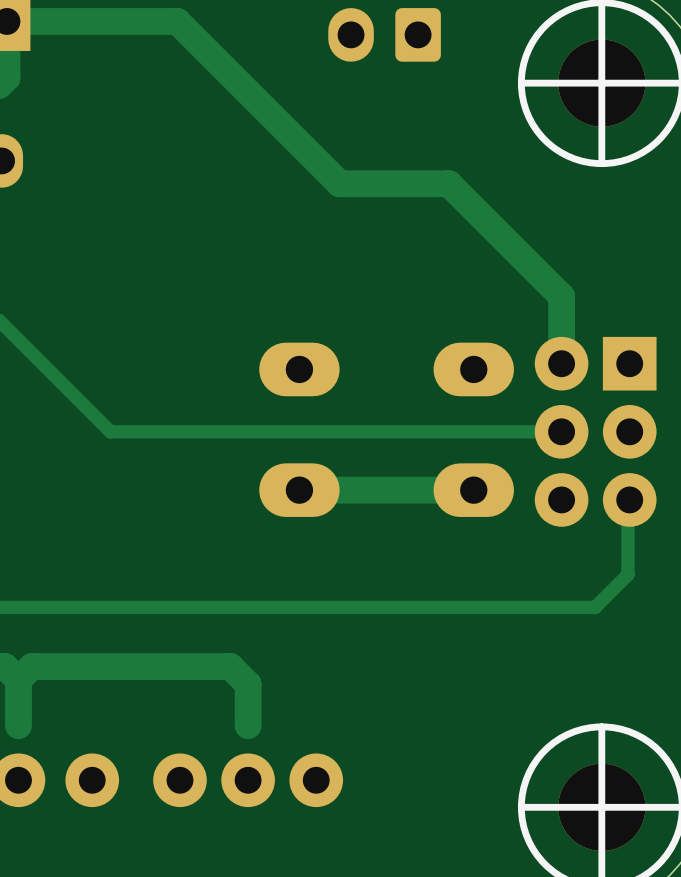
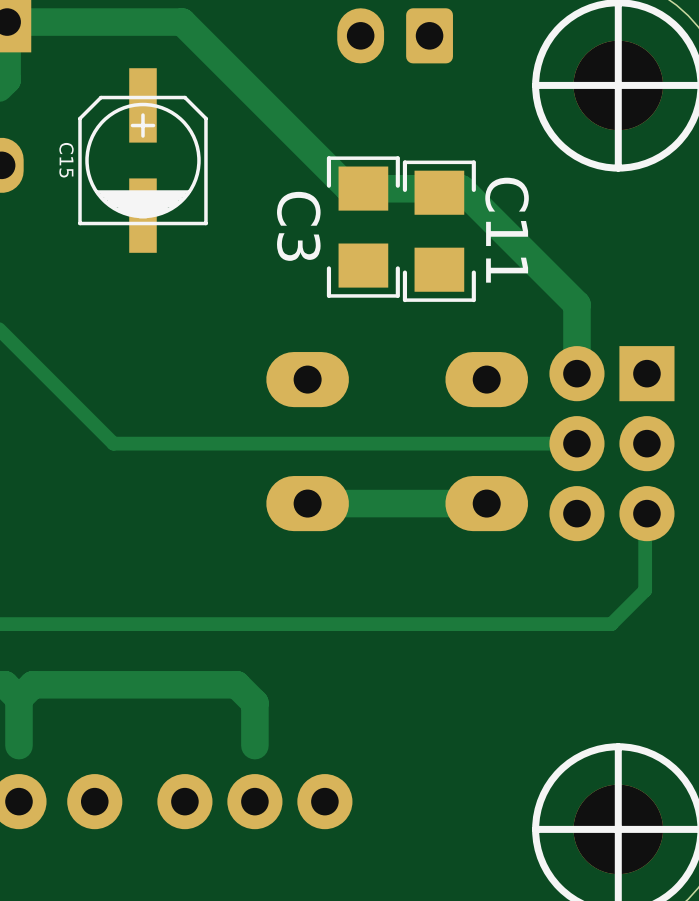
C15: none -> (142, 160)
C3: none -> (363, 227)
C11: none -> (439, 231)

